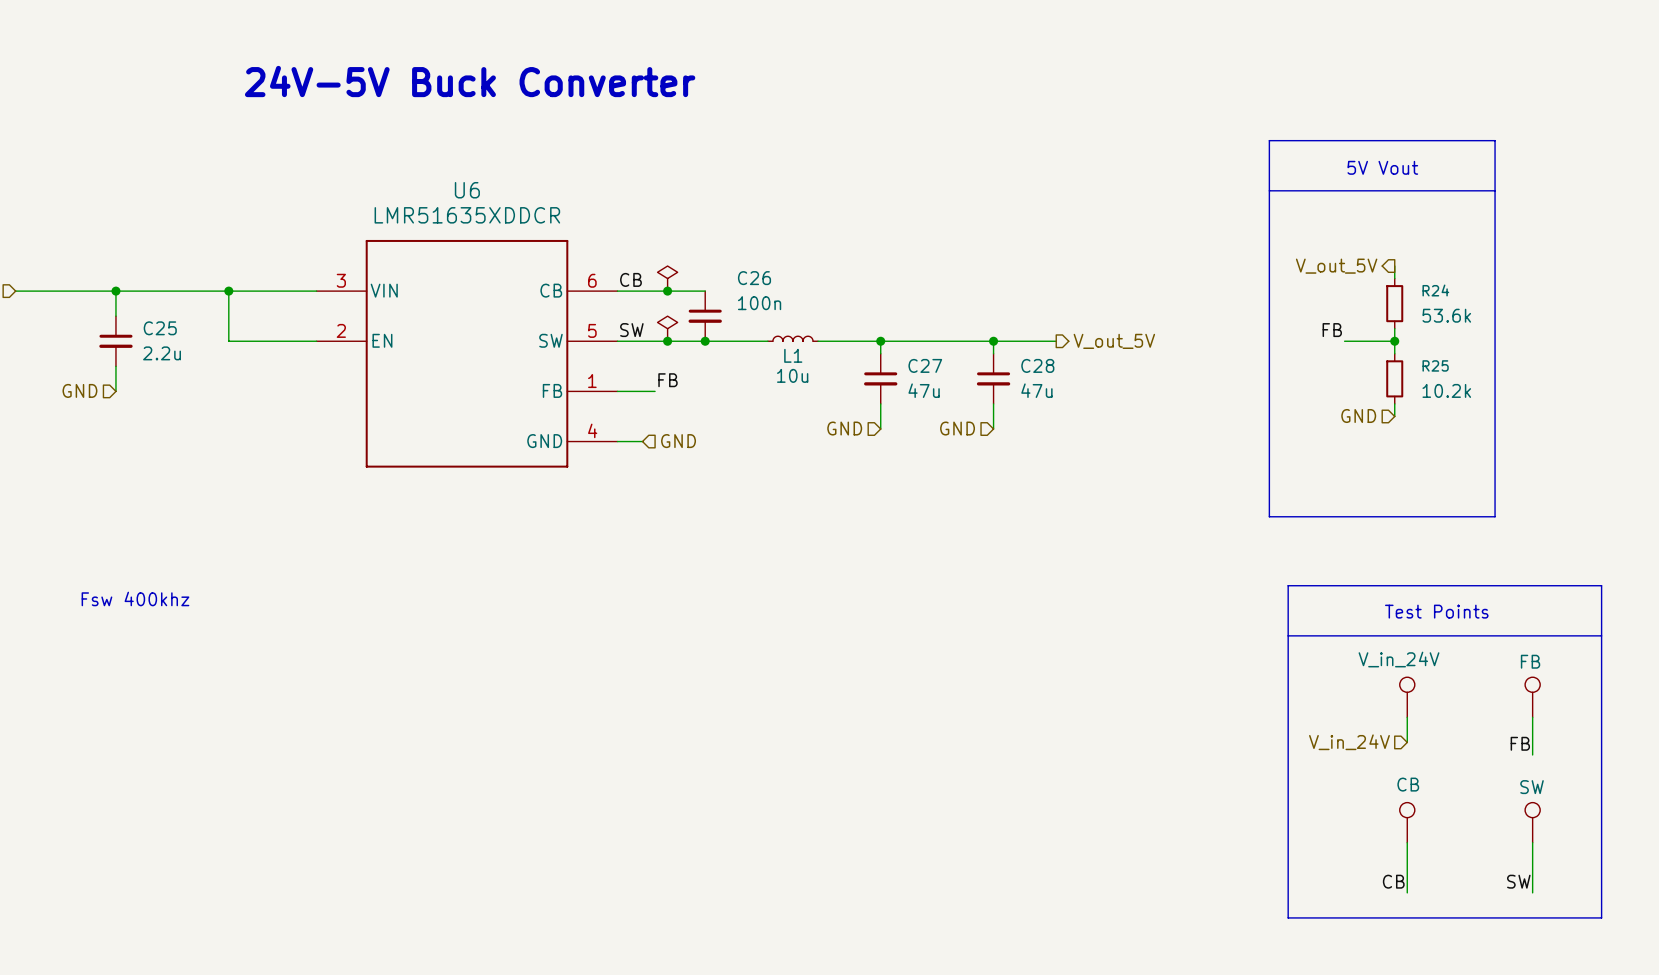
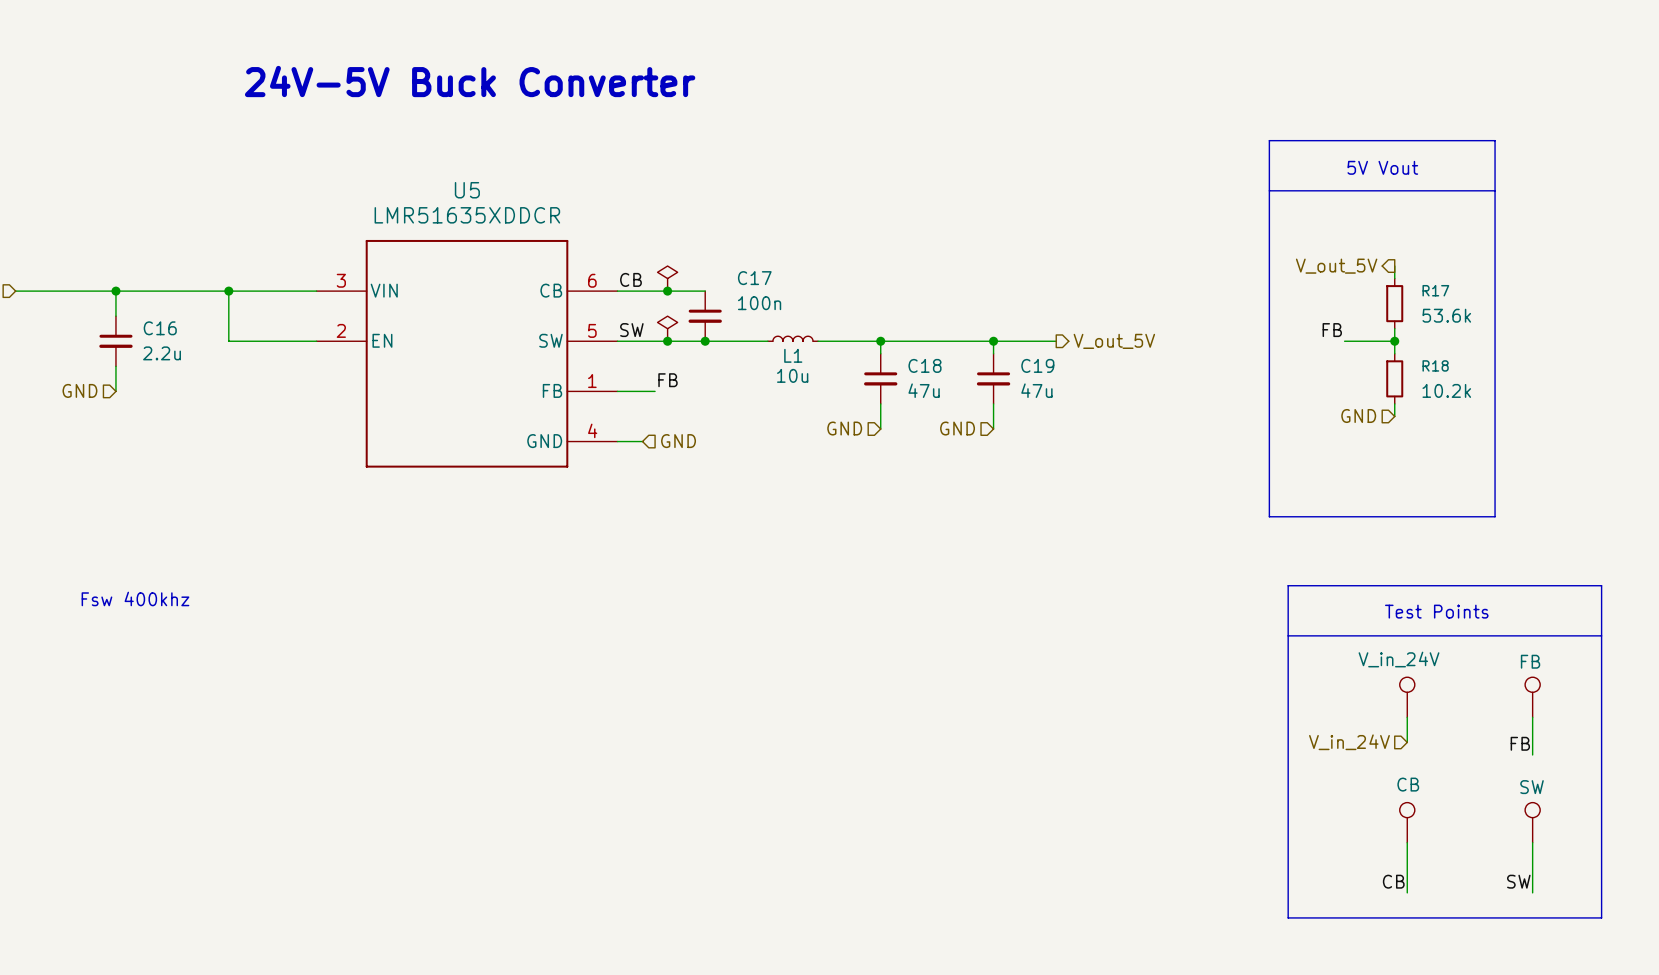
U6 name: U6 (467, 190) -> U5 (467, 190)
C26 name: C26 (754, 278) -> C17 (754, 278)
R24 name: R24 (1435, 290) -> R17 (1435, 290)
C25 name: C25 (160, 328) -> C16 (160, 328)
C27 name: C27 (925, 365) -> C18 (924, 365)
C28 name: C28 (1037, 365) -> C19 (1037, 365)
R25 name: R25 (1435, 365) -> R18 (1435, 365)

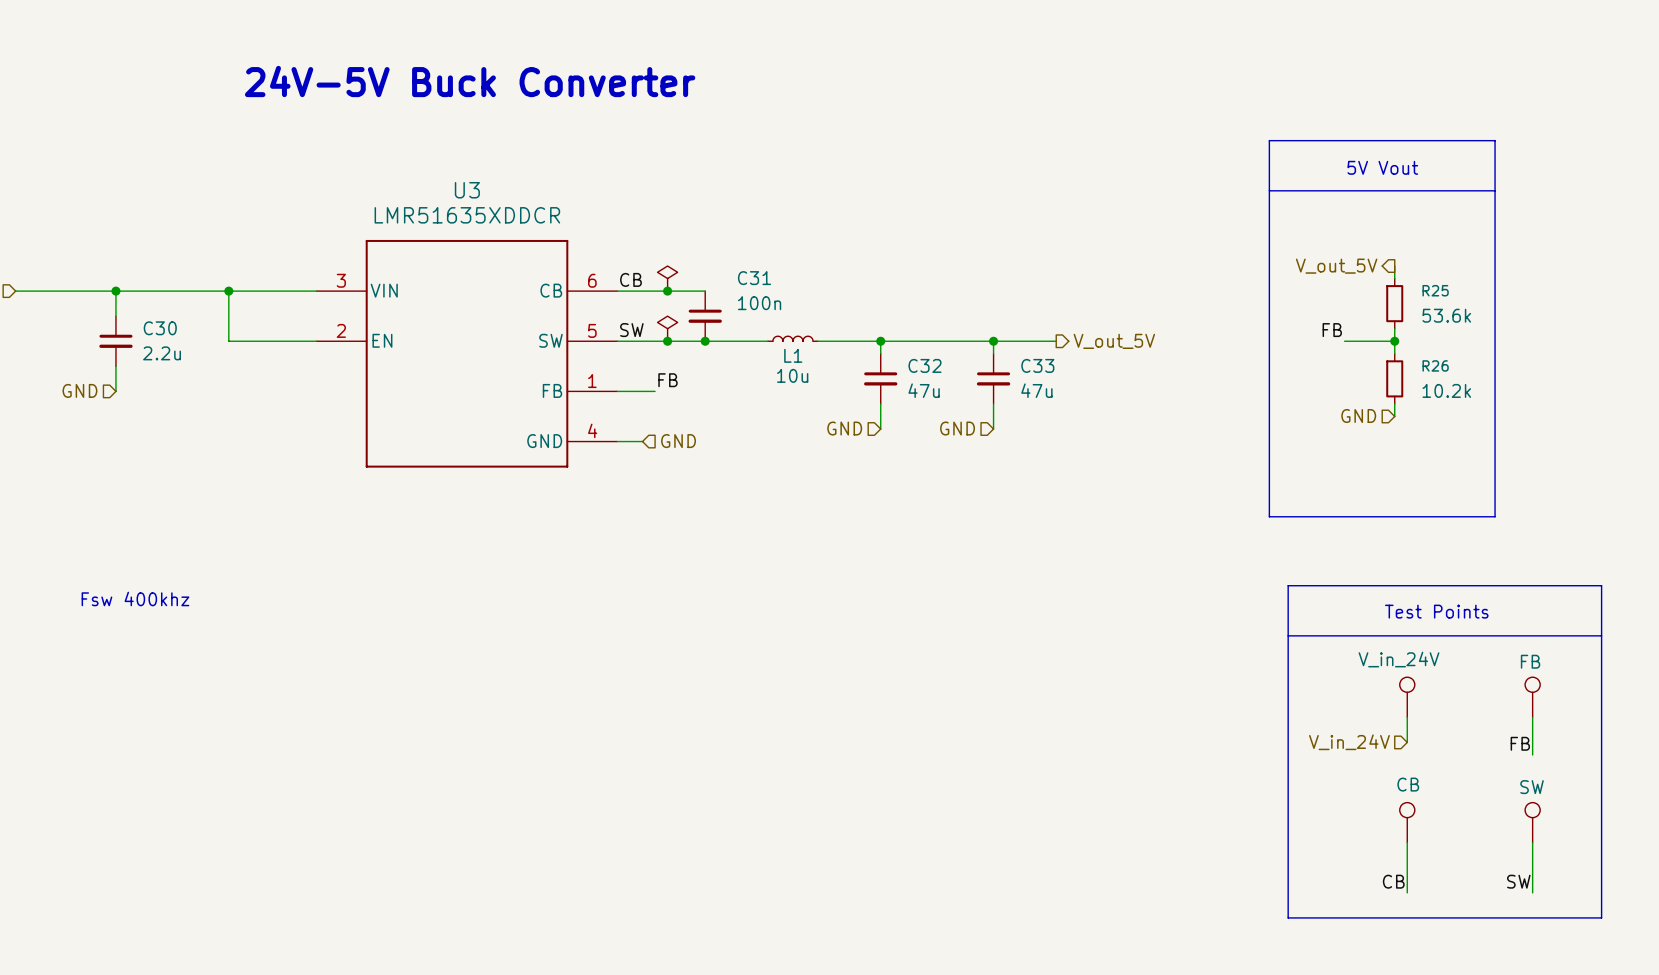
U5 name: U5 (467, 190) -> U3 (467, 190)
C17 name: C17 (754, 278) -> C31 (754, 278)
R17 name: R17 (1435, 290) -> R25 (1435, 290)
C16 name: C16 (160, 328) -> C30 (160, 328)
C18 name: C18 (924, 365) -> C32 (924, 365)
C19 name: C19 (1037, 365) -> C33 (1037, 365)
R18 name: R18 (1435, 365) -> R26 (1435, 365)

